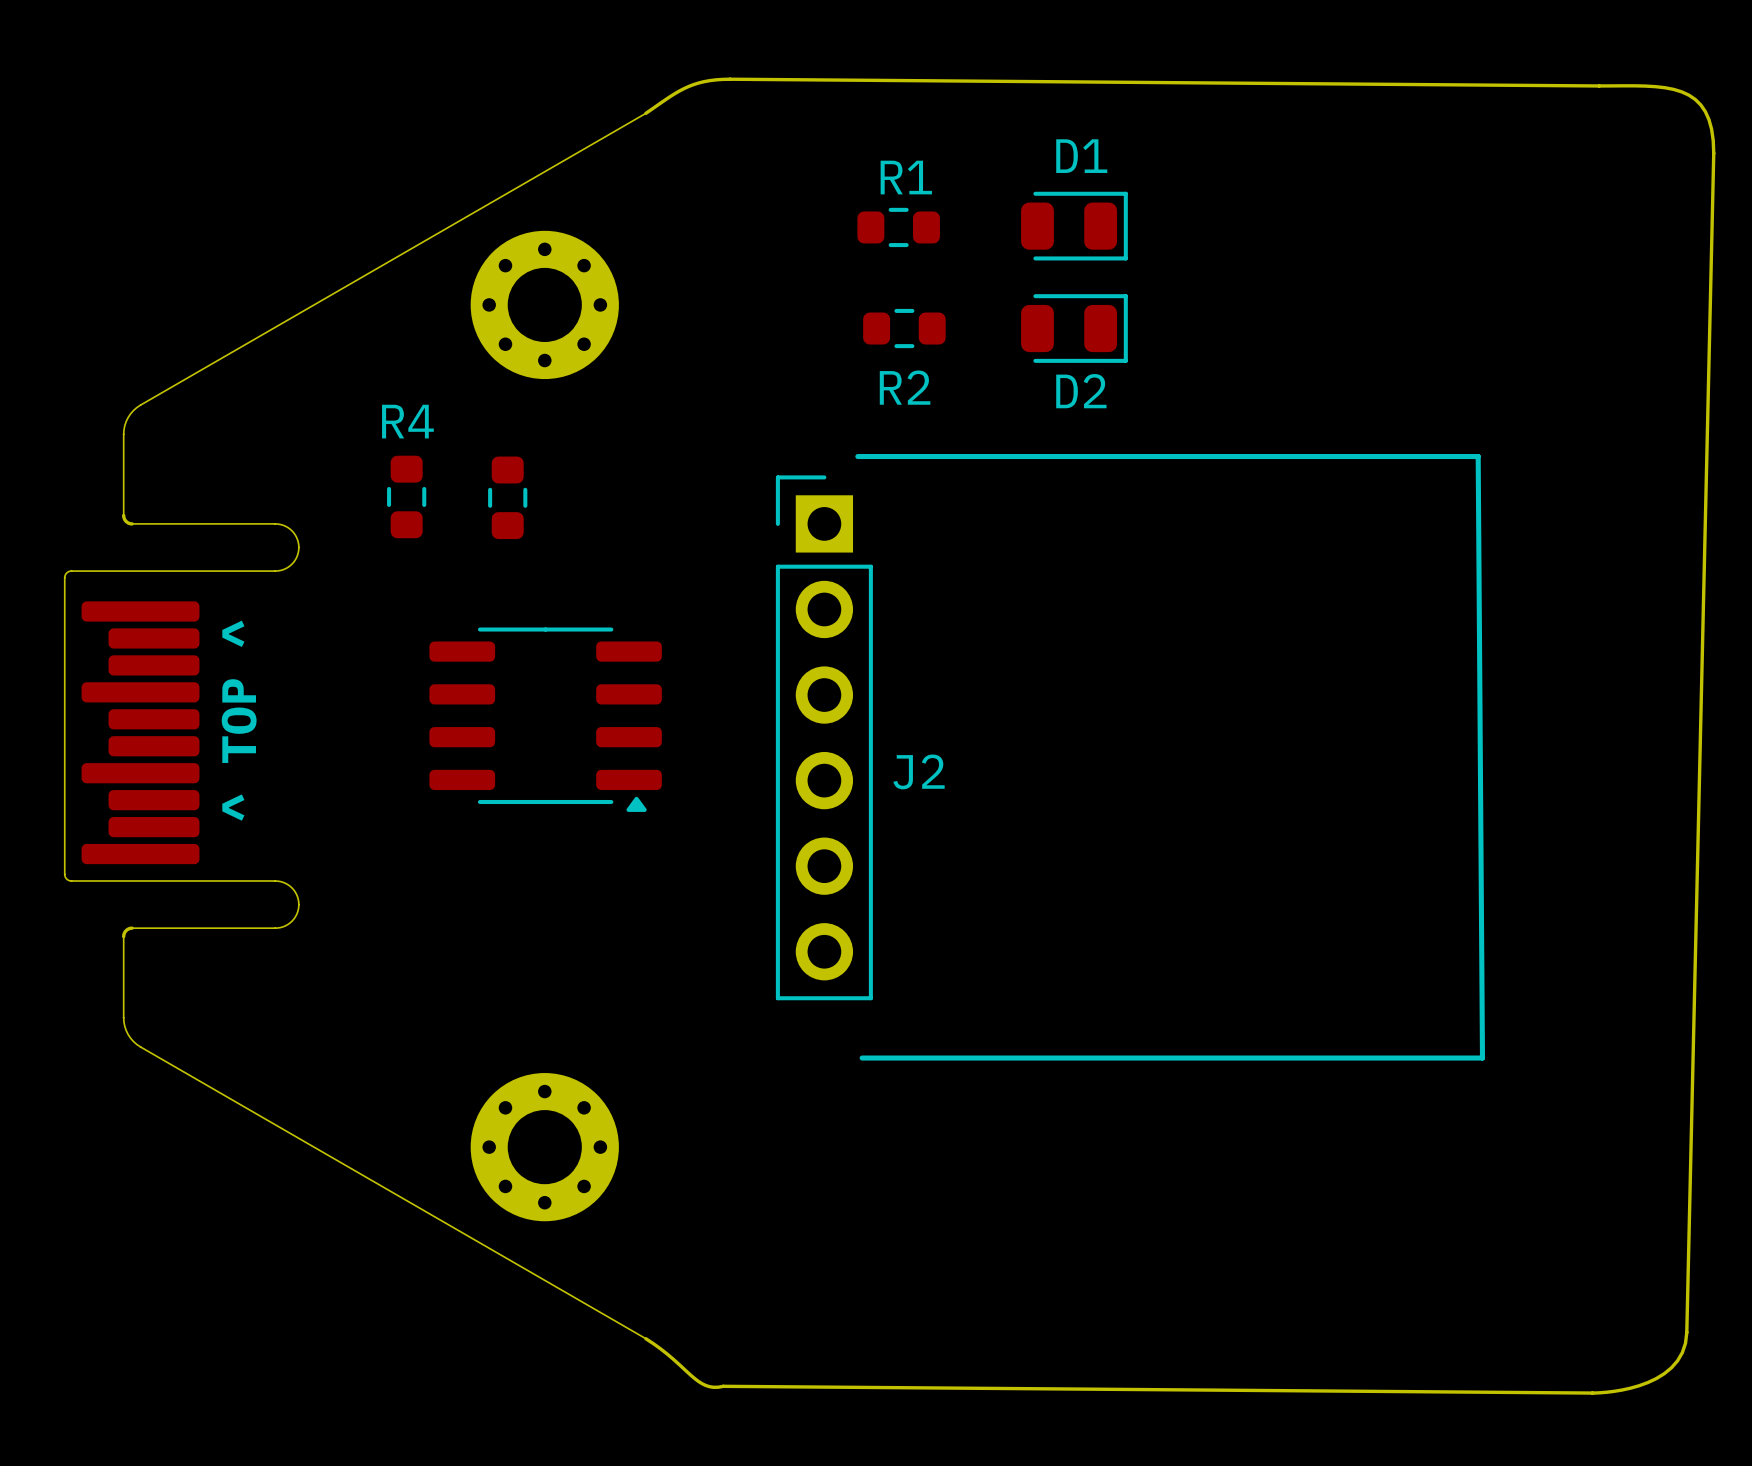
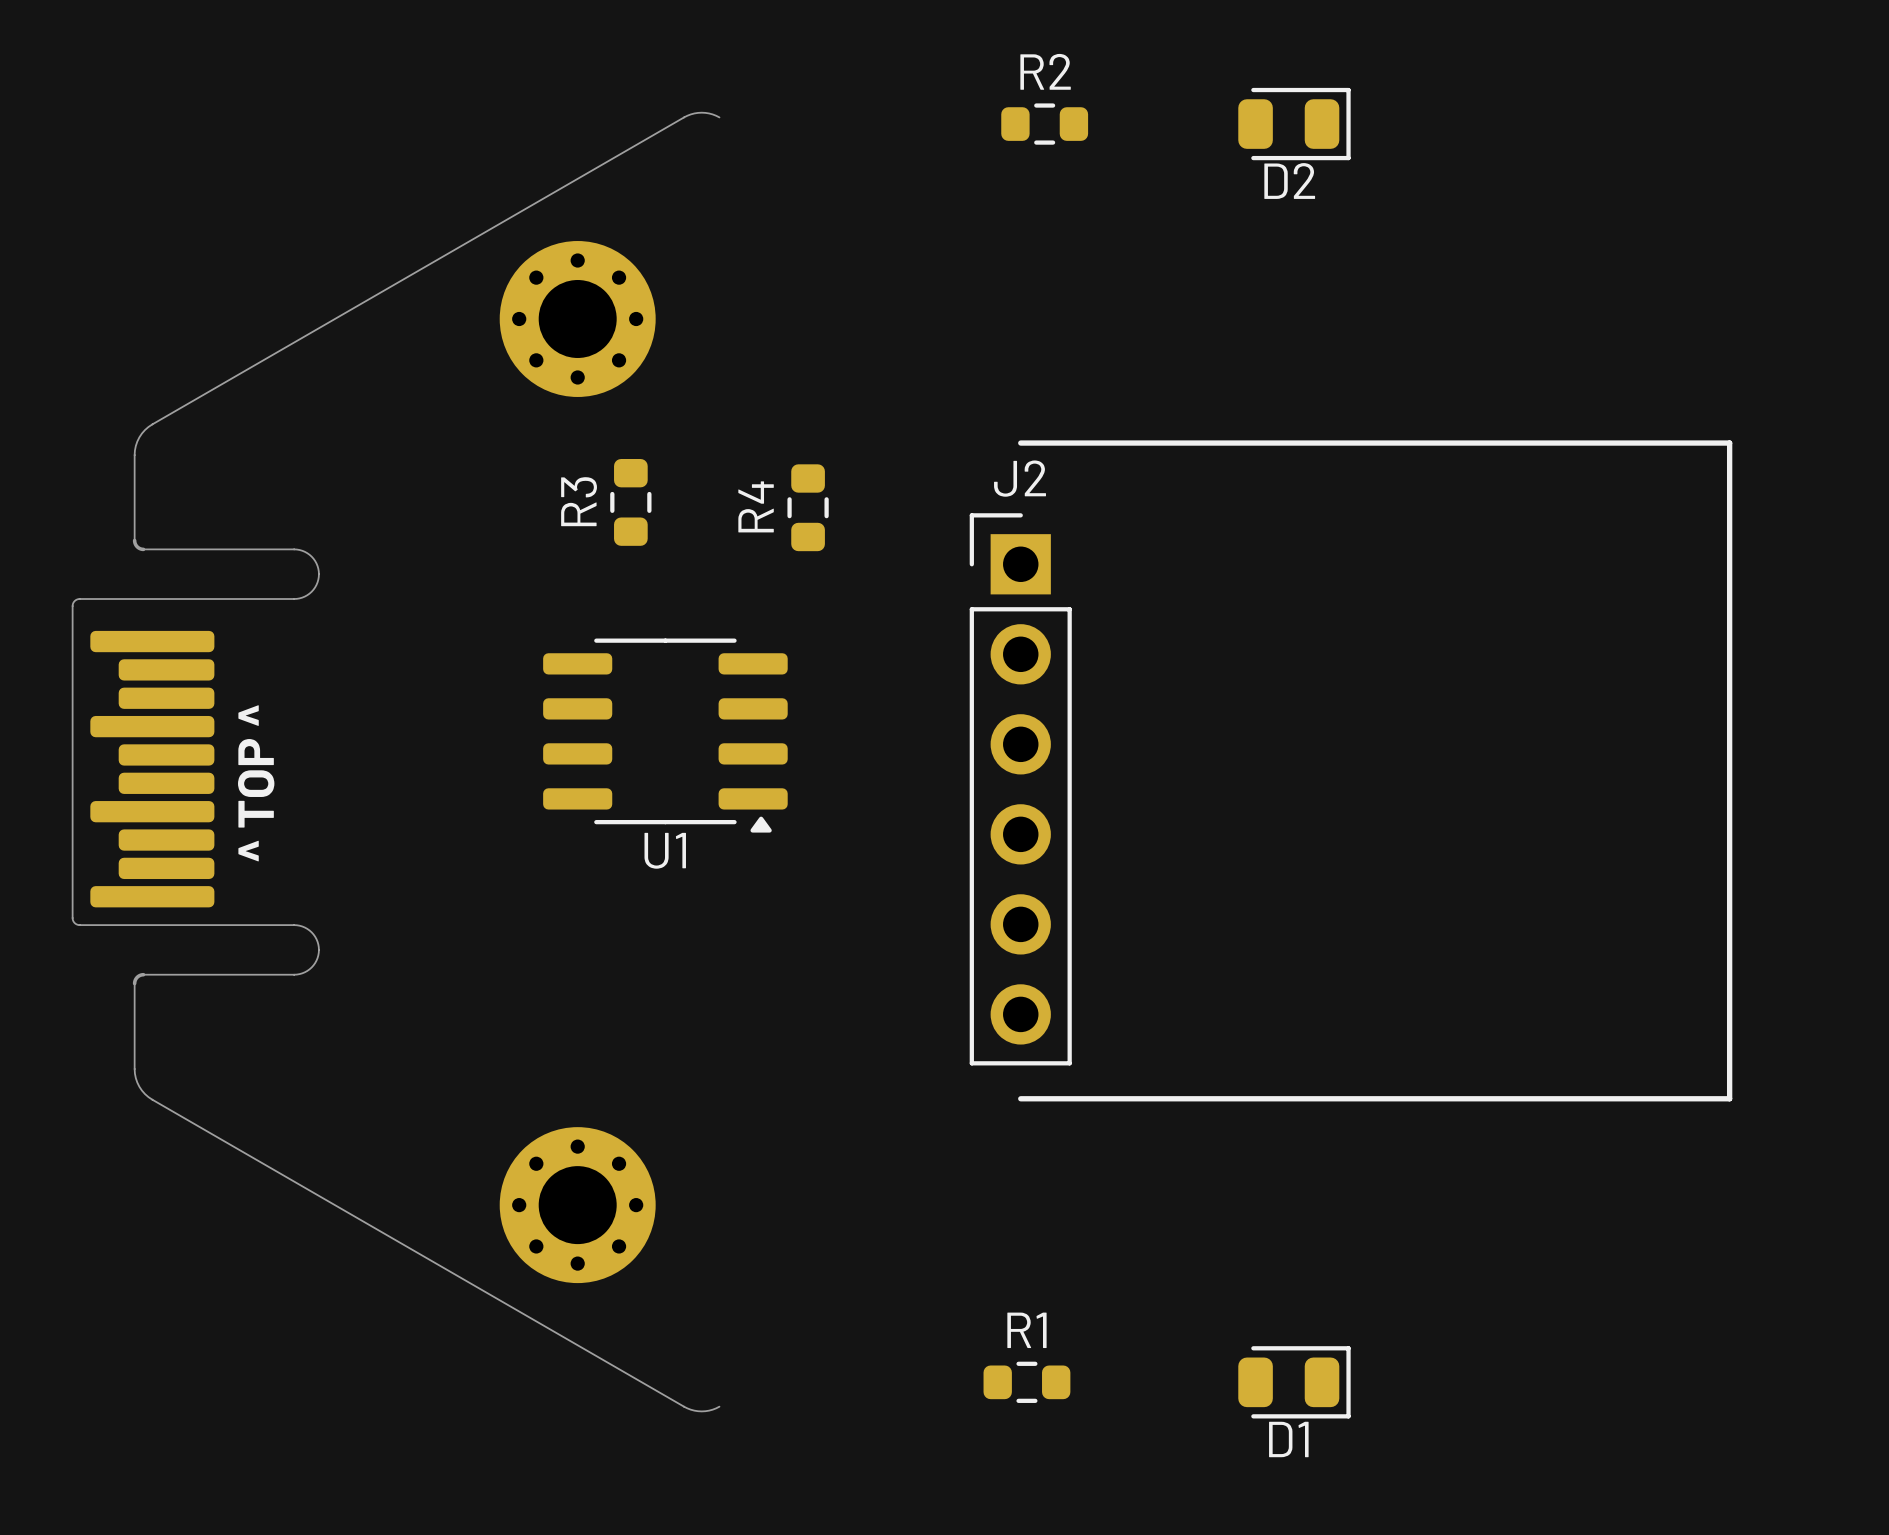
board edge: (645, 113) (688, 86) (704, 81) (722, 79) (1645, 86) (1673, 89) (1695, 99) (1705, 111) (1708, 119) (1713, 153) (1686, 1332) (1682, 1352) (1671, 1367) (1656, 1378) (1639, 1385) (1614, 1391) (1593, 1393) (714, 1387) (698, 1381) (666, 1353) (645, 1338) -> (684, 117) (701, 112) (719, 117)
D1 name position: D1 (1081, 156) -> D1 (1288, 1439)
R1 name position: R1 (906, 177) -> R1 (1026, 1330)
D1 position: (1074, 226) -> (1294, 1382)
R1 position: (898, 227) -> (1026, 1382)
R2 position: (904, 328) -> (1044, 124)
D2 position: (1074, 328) -> (1294, 124)
R2 name position: R2 (905, 387) -> R2 (1045, 71)
D2 name position: D2 (1081, 391) -> D2 (1289, 181)
R4 name rotation: 0° (407, 421) -> 90° counterclockwise (756, 506)
R4 name position: R4 (407, 421) -> R4 (756, 506)
line: none -> (1020, 443) (1729, 443) (1729, 1098) (1020, 1098)
line: (857, 456) (1478, 456) (1482, 1058) (862, 1058) -> none
R3: none -> (630, 502)
R4 position: (406, 496) -> (808, 507)
part: (507, 497) -> none
U1: none -> (665, 735)
part: (545, 719) -> none
J2 position: (824, 737) -> (1020, 789)
J2 name position: J2 (918, 771) -> J2 (1020, 478)
board edge: none -> (684, 1406) (701, 1411) (719, 1406)

